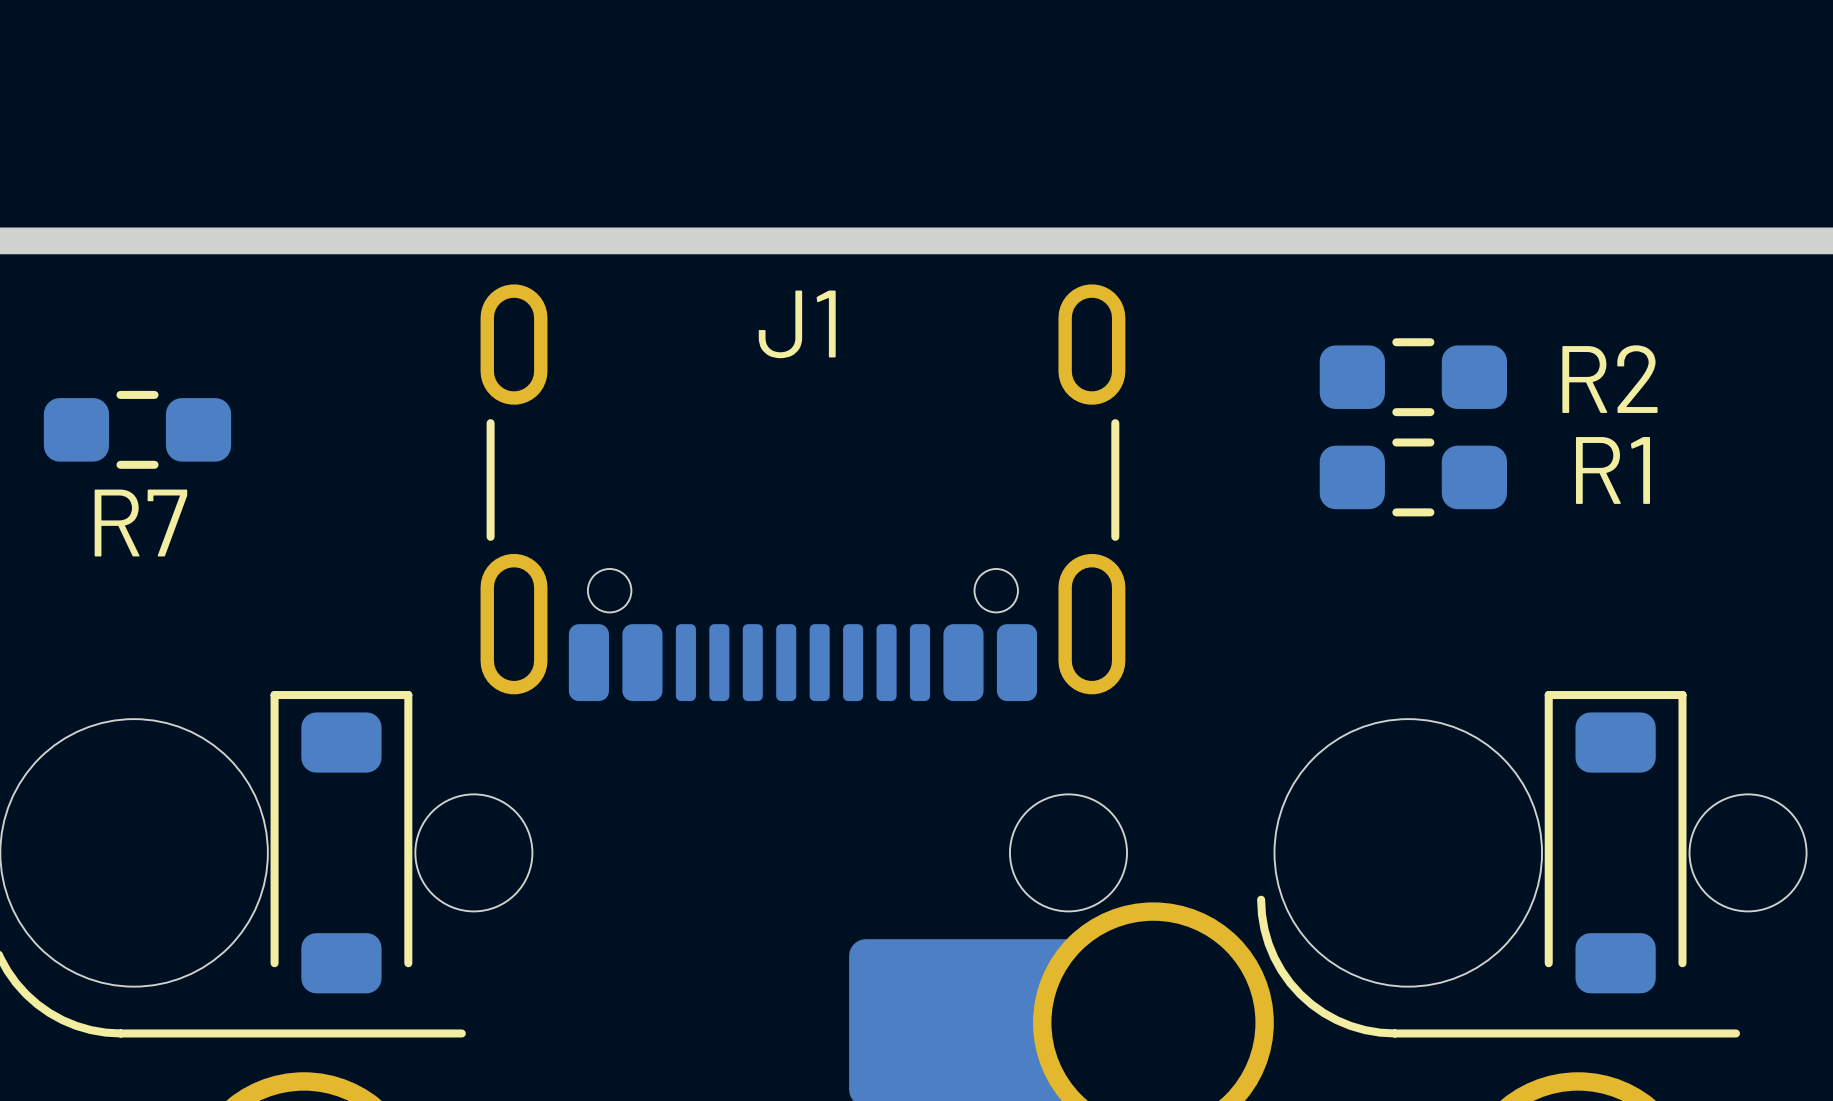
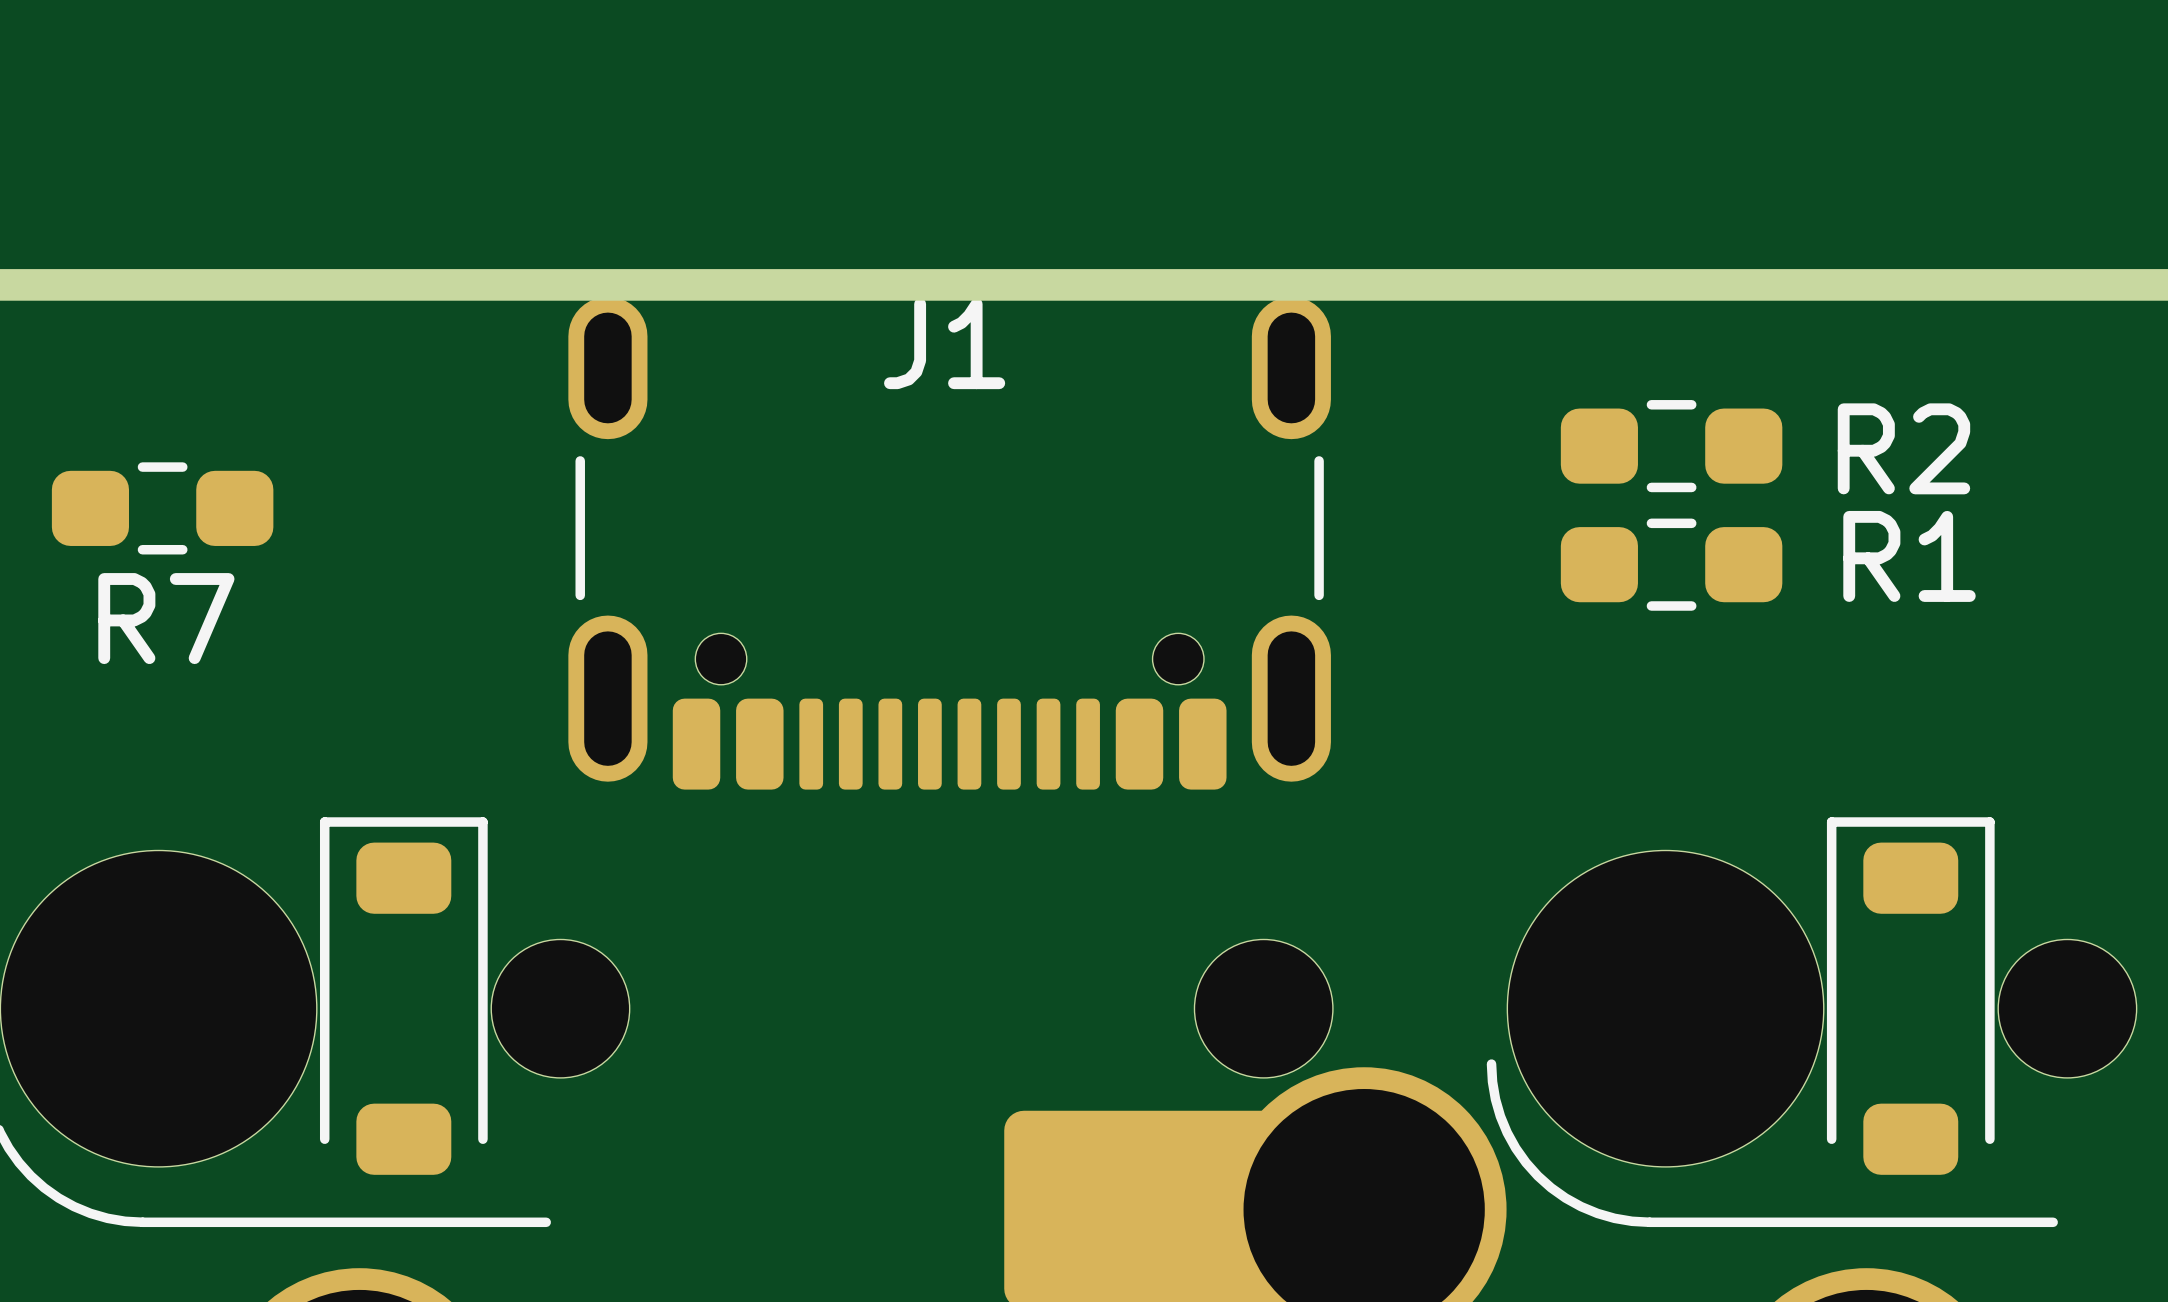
J1 position: (802, 492) -> (949, 543)

